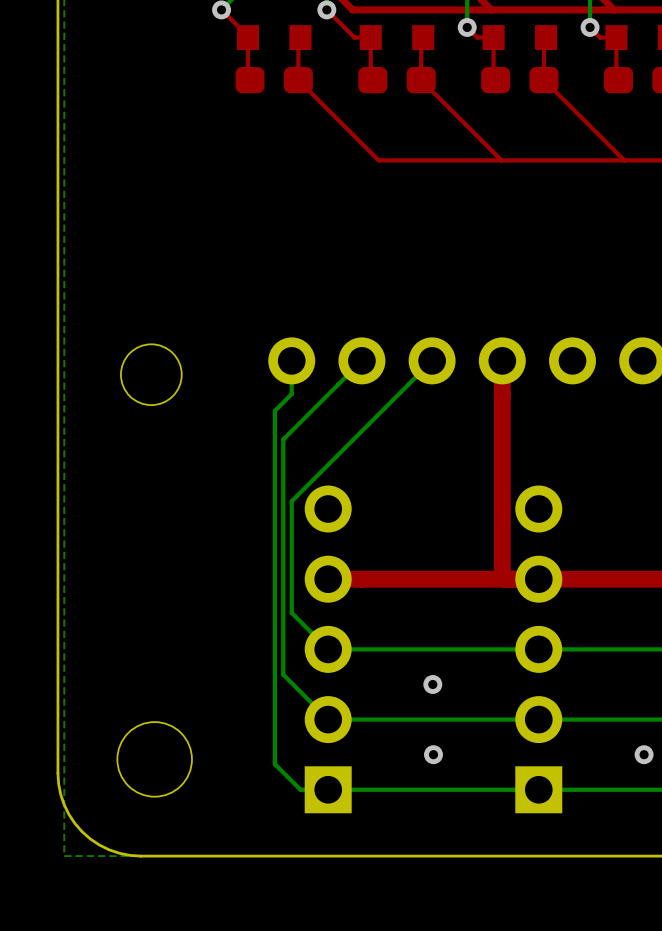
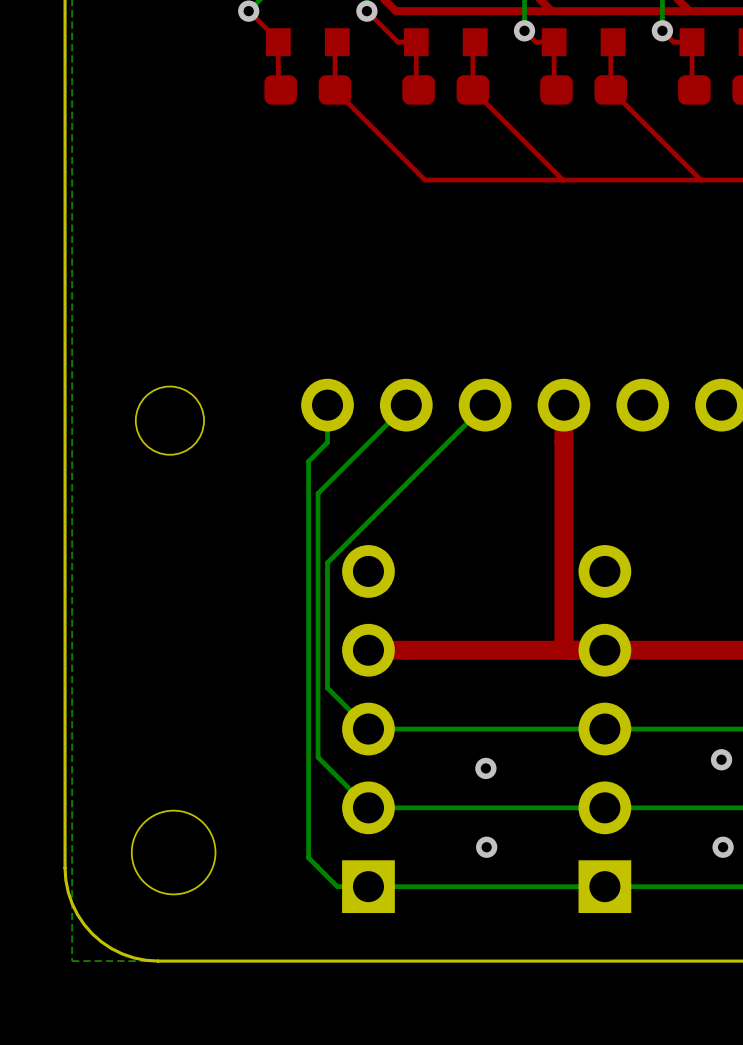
via: none -> (721, 759)

